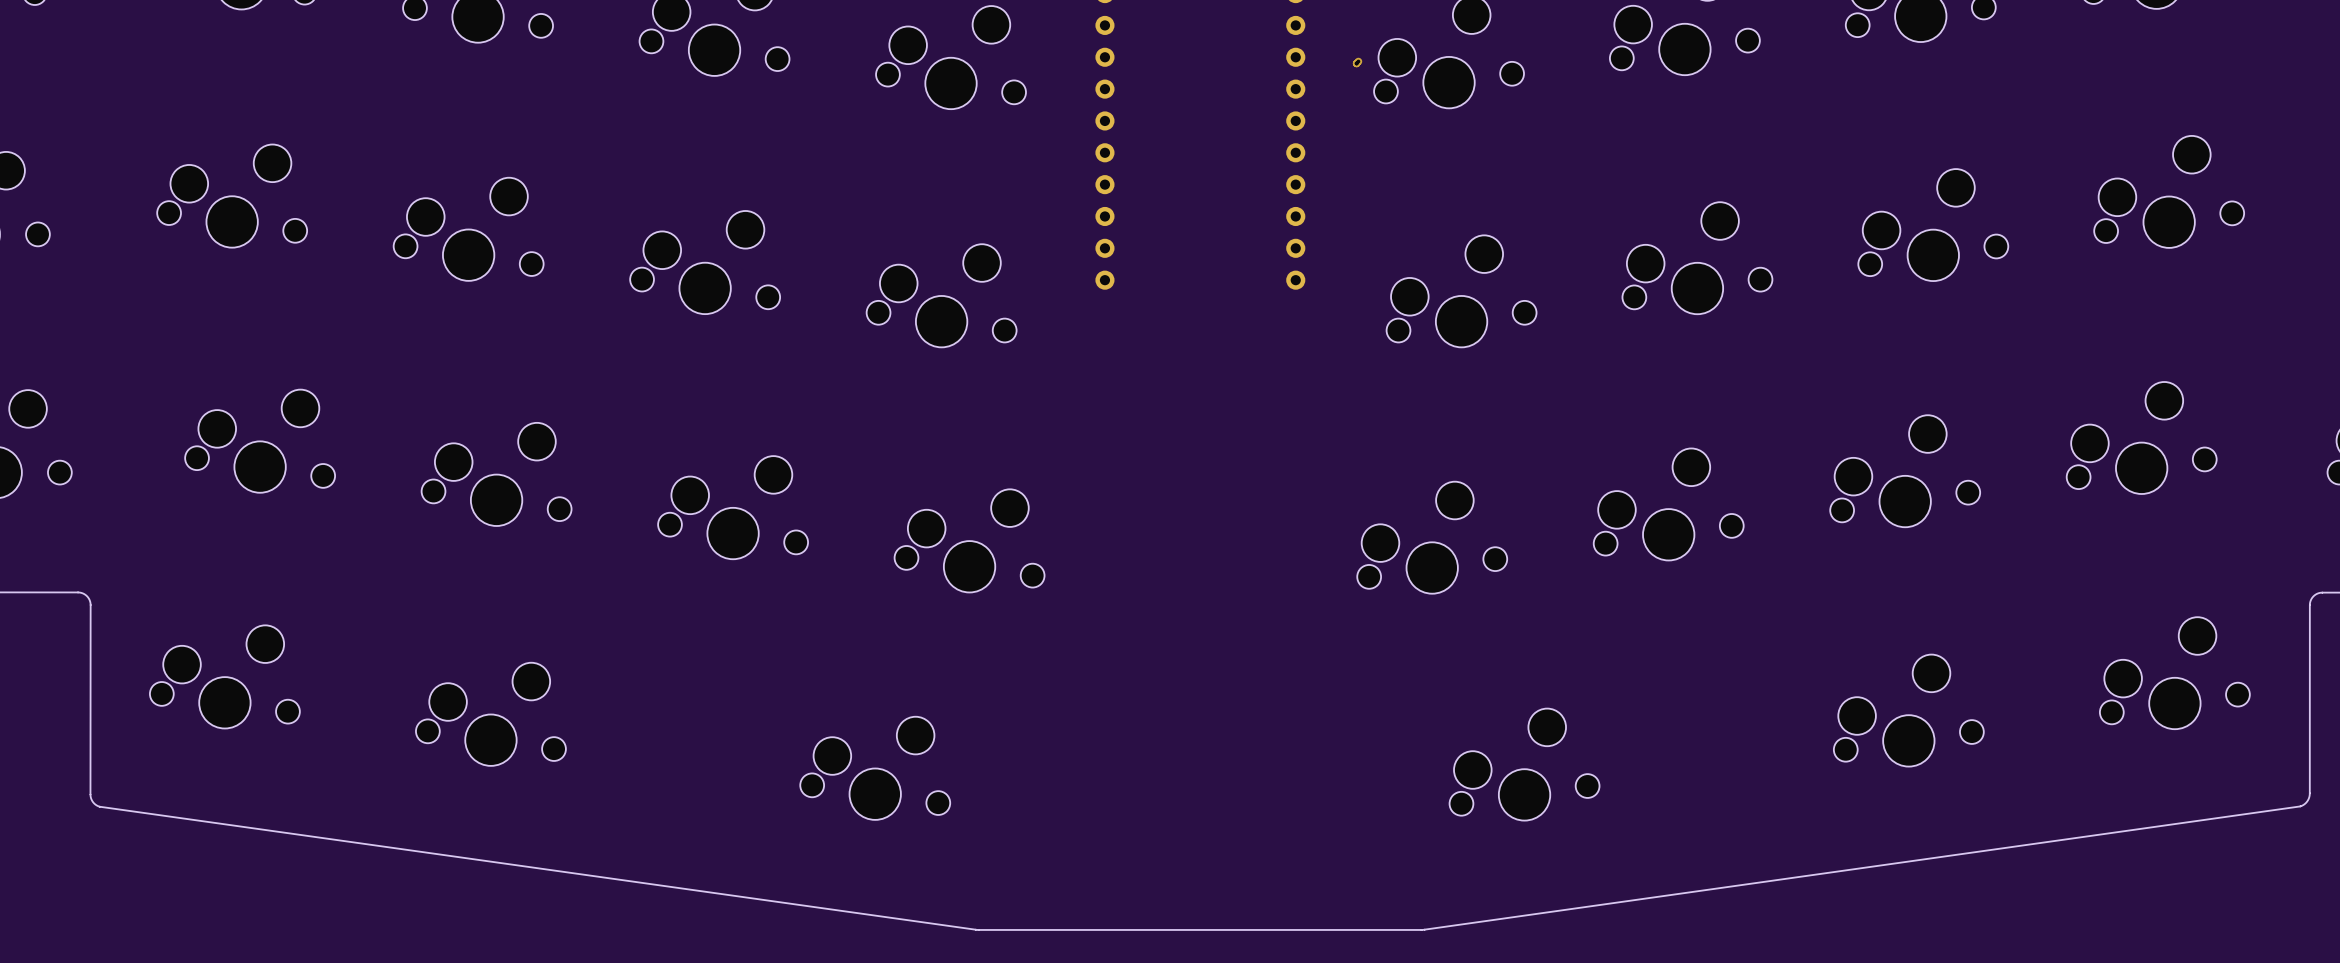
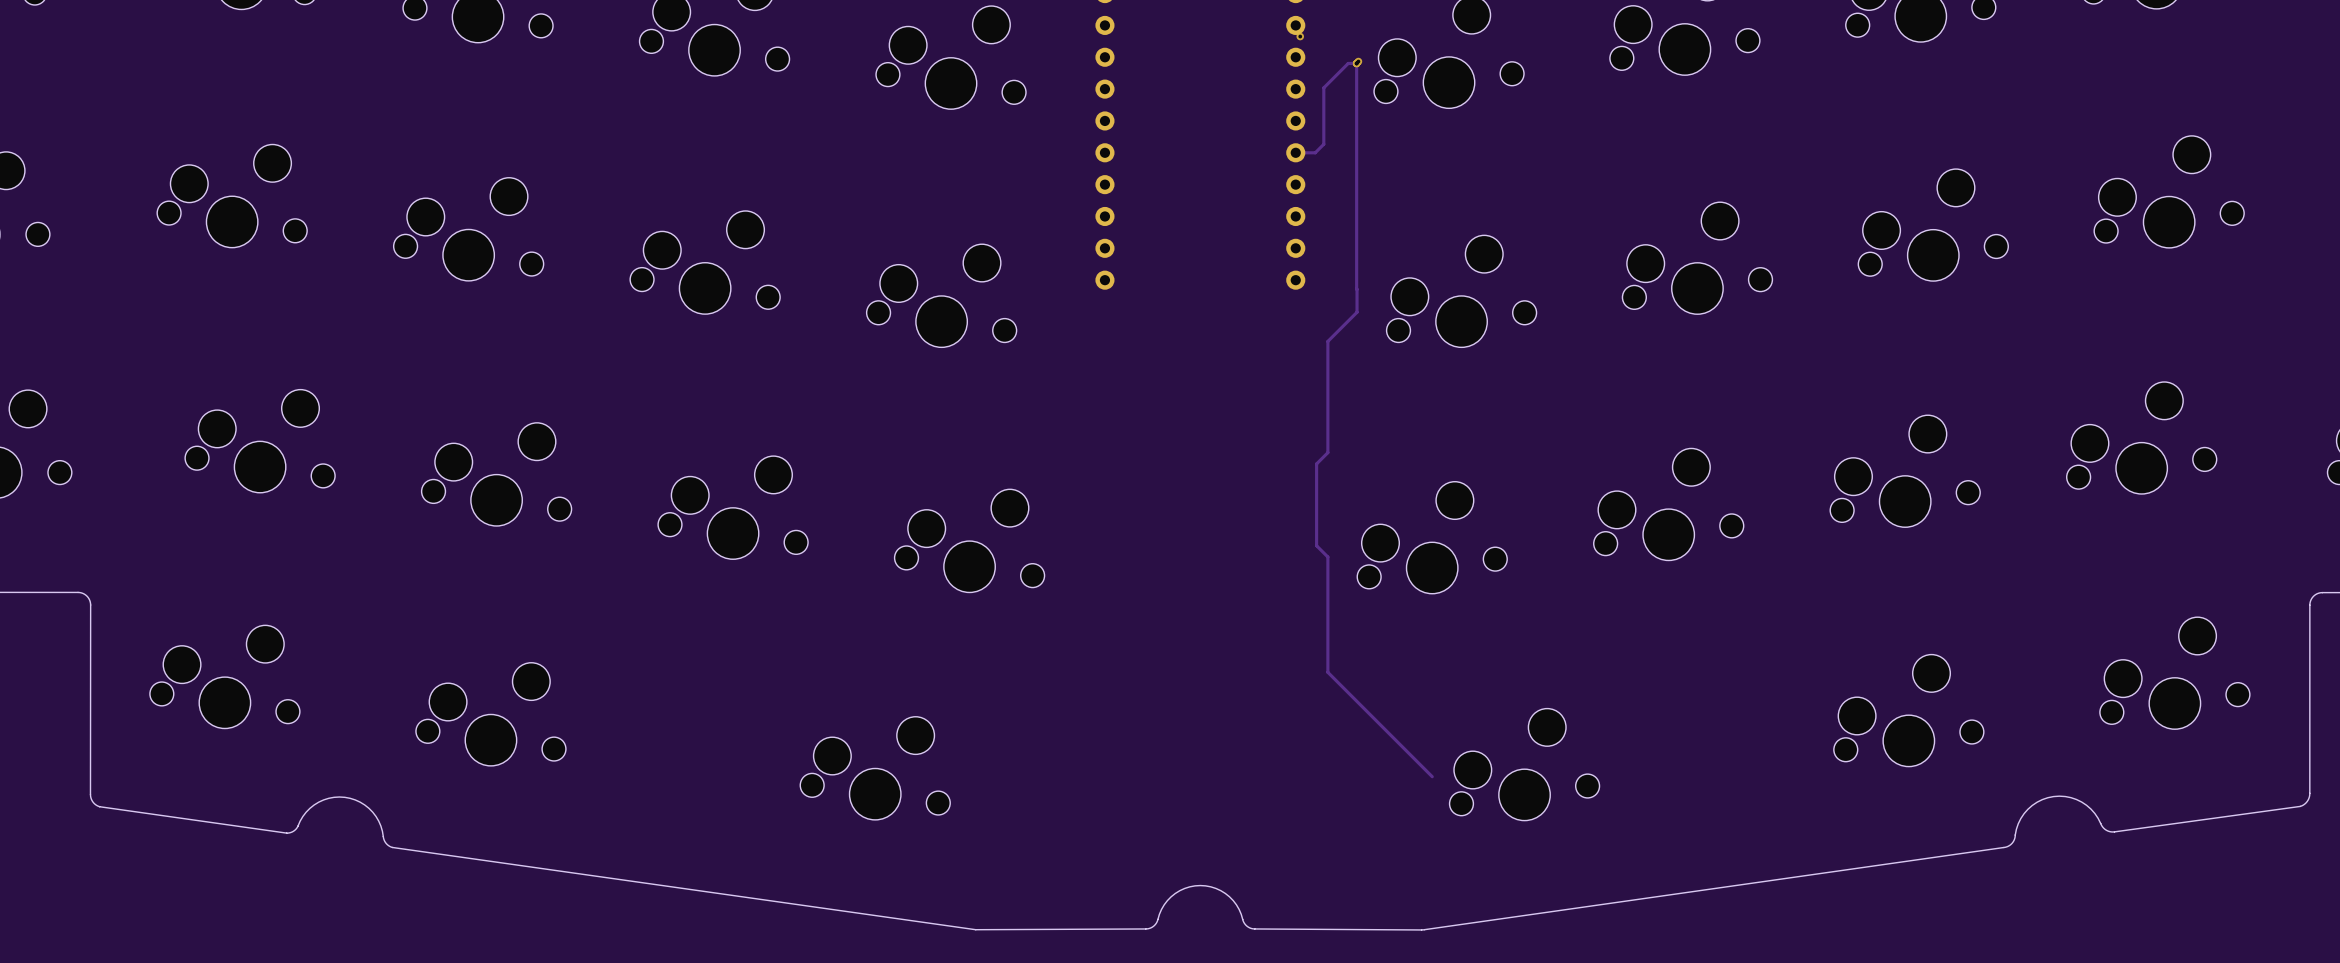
via: none -> (1300, 36)
track: none -> (1295, 152) (1315, 152) (1323, 144) (1323, 87) (1348, 63) (1356, 63) (1357, 312) (1327, 341) (1327, 452) (1316, 463) (1316, 545) (1327, 557) (1327, 672) (1432, 776)
board edge: (99, 806) (978, 929) -> (99, 806) (286, 833) (295, 829) (302, 816) (314, 804) (328, 798) (344, 797) (360, 802) (372, 812) (380, 826) (384, 840) (392, 847) (975, 929) (1148, 928) (1156, 923) (1161, 909) (1171, 896) (1184, 888) (1200, 885) (1215, 888) (1229, 896) (1239, 909) (1244, 923) (1252, 928) (1421, 929)
board edge: (2300, 806) (1424, 929) -> (2100, 823) (2090, 809) (2081, 802) (2070, 797) (2053, 796) (2037, 802) (2027, 809) (2018, 823) (2013, 840) (2005, 847) (1424, 929)
board edge: none -> (2300, 806) (2114, 831) (2106, 830) (2100, 823)
board edge: (1421, 929) (978, 929) -> none

